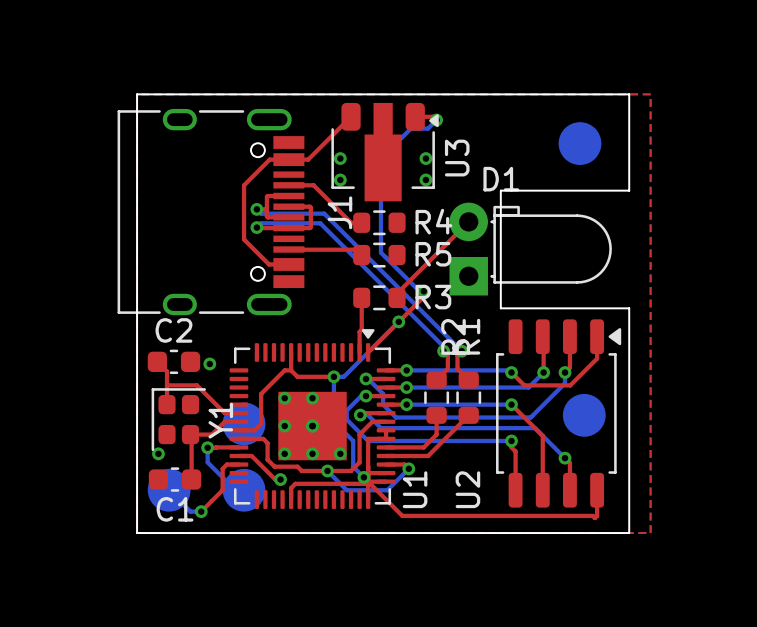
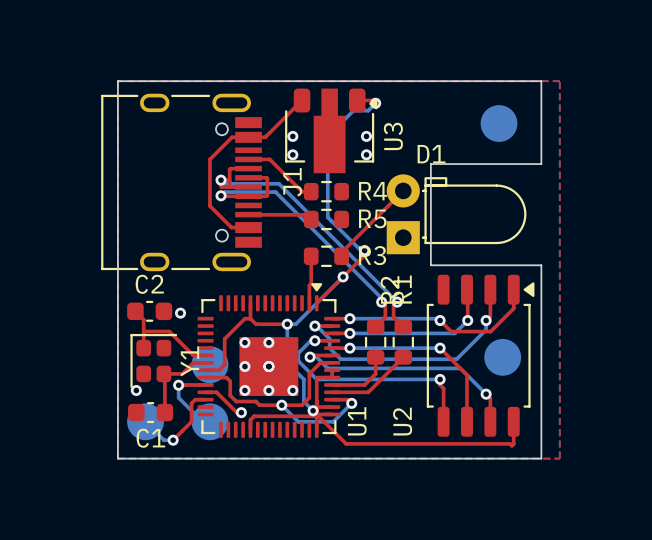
top track: none -> (220, 186) (230, 187)

